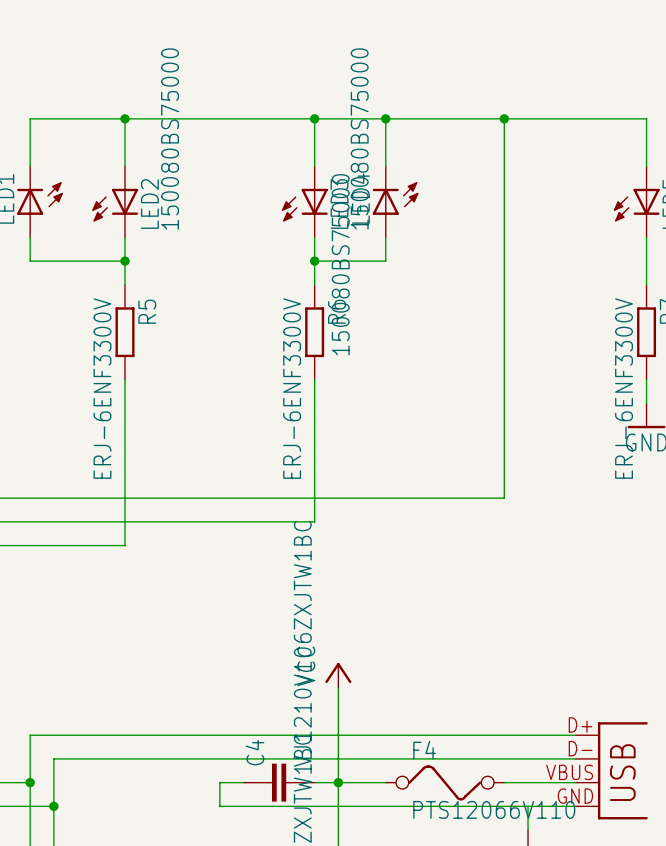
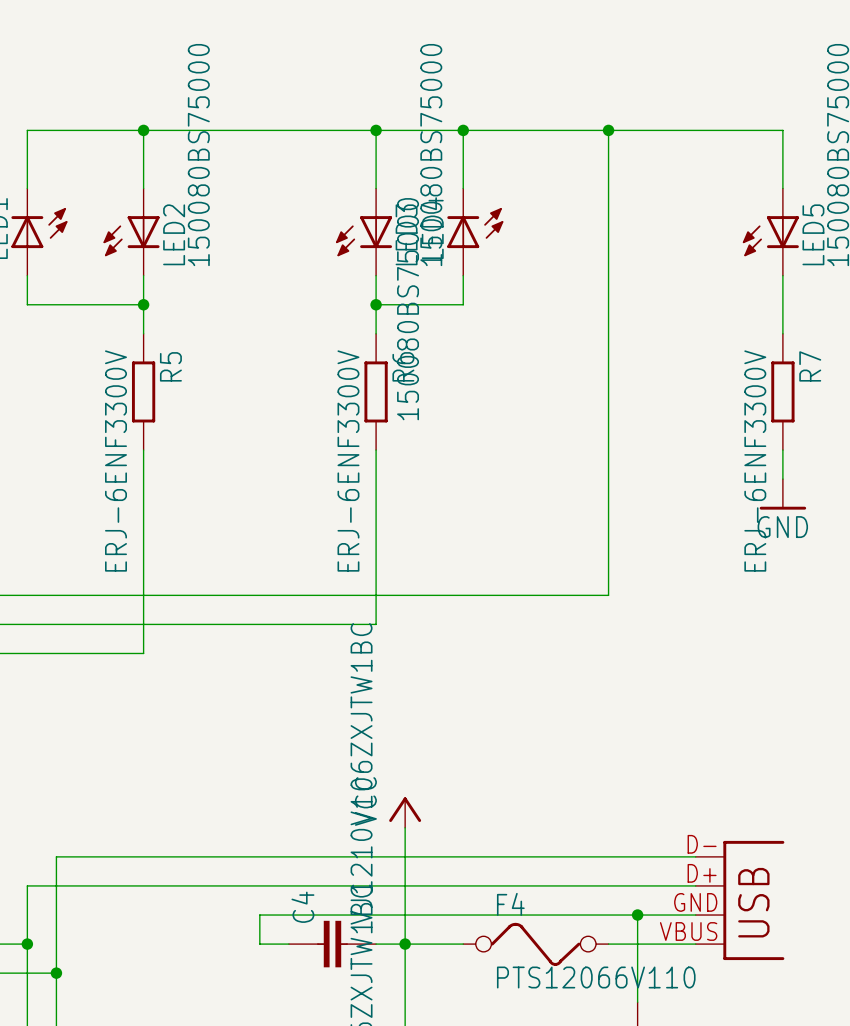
wire: none -> (695, 856) (56, 856) (56, 915)
part: none -> (740, 900)
wire: (53, 758) (219, 758) -> (259, 944) (259, 915)
wire: none -> (637, 915) (637, 973)
junction: none -> (637, 915)
part: (611, 770) -> none
wire: (219, 782) (219, 806) (575, 806) -> none

